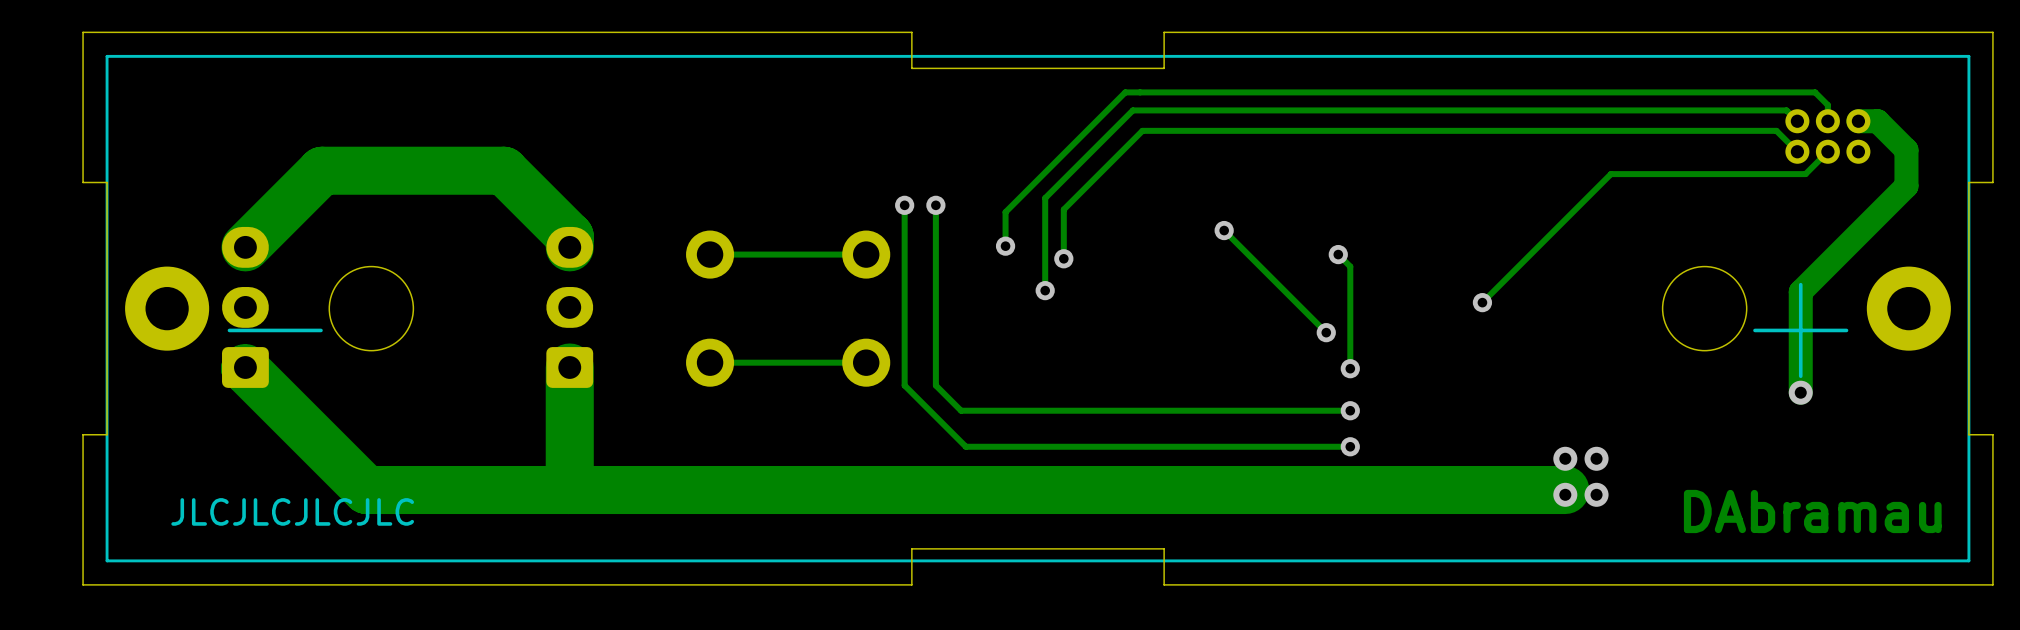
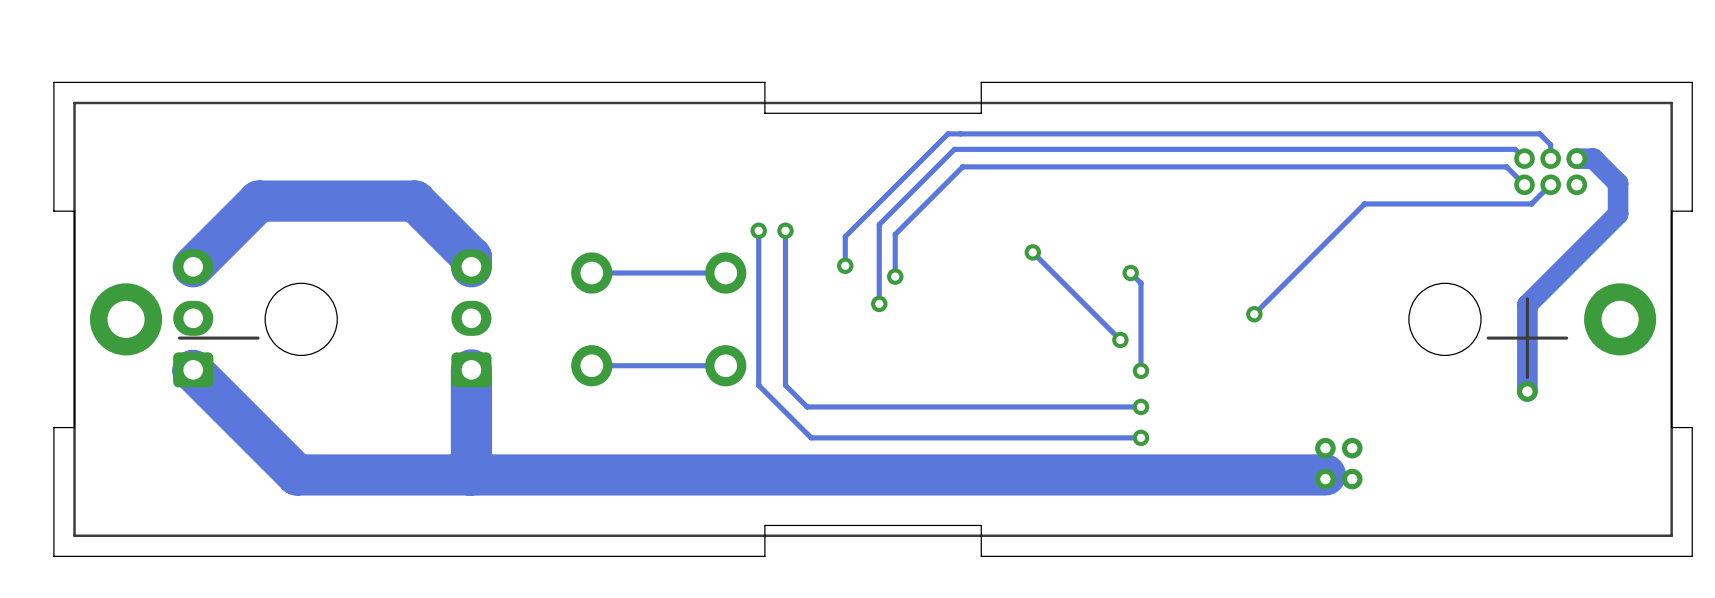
text: JLCJLCJLCJLC (292, 511) -> none
text: DAbramau (1812, 511) -> none

